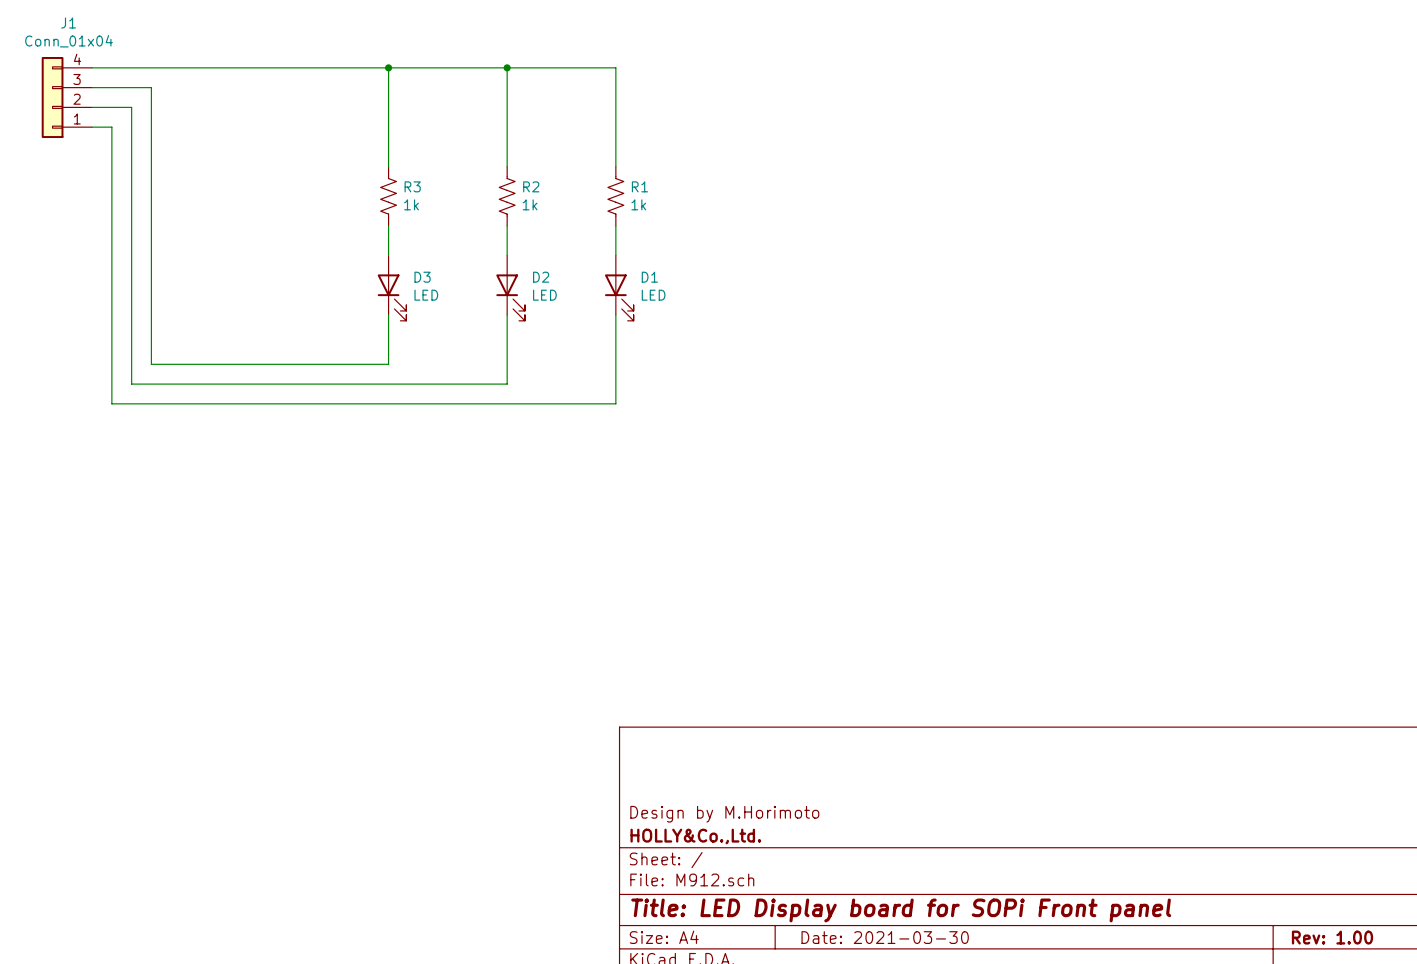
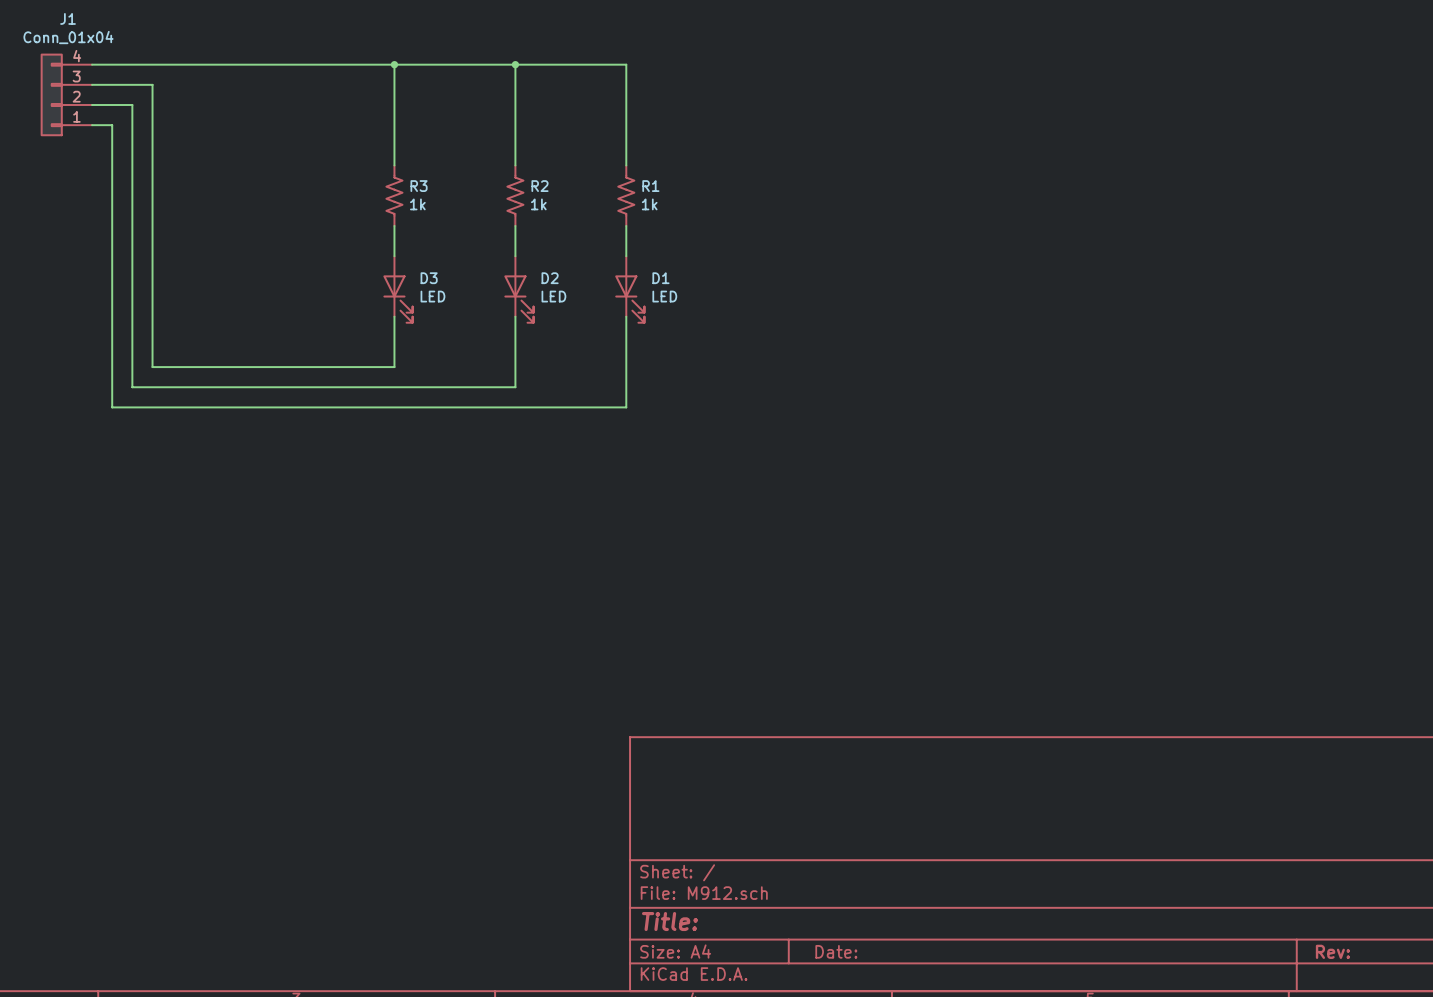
title block: Design by M.Horimoto (724, 814) -> none
title block: HOLLY&Co.,Ltd. (695, 836) -> none
title block: Title: LED Display board for SOPi Front panel (901, 910) -> Title: (669, 921)
title block: Date: 2021-03-30 (885, 937) -> Date: (836, 951)
title block: Rev: 1.00 (1332, 937) -> Rev: (1332, 951)

